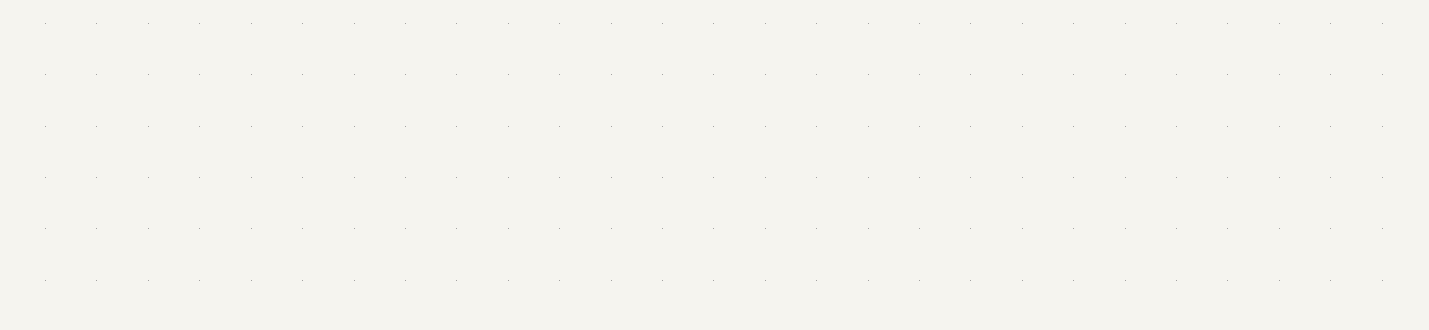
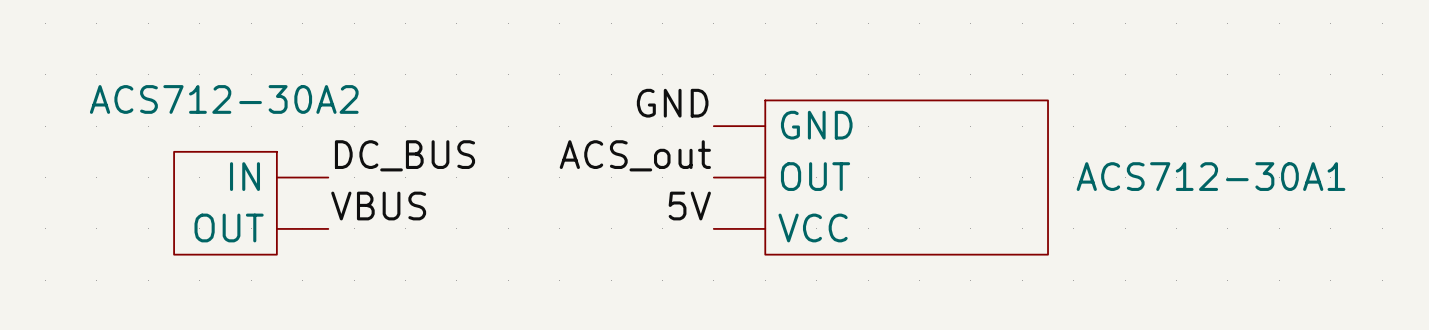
label: none -> GND (672, 103)
label: none -> DC_BUS (404, 155)
label: none -> ACS_out (635, 155)
ACS712-30A1: none -> (880, 177)
ACS712-30A2: none -> (251, 203)
label: none -> VBUS (378, 206)
label: none -> 5V (689, 206)

